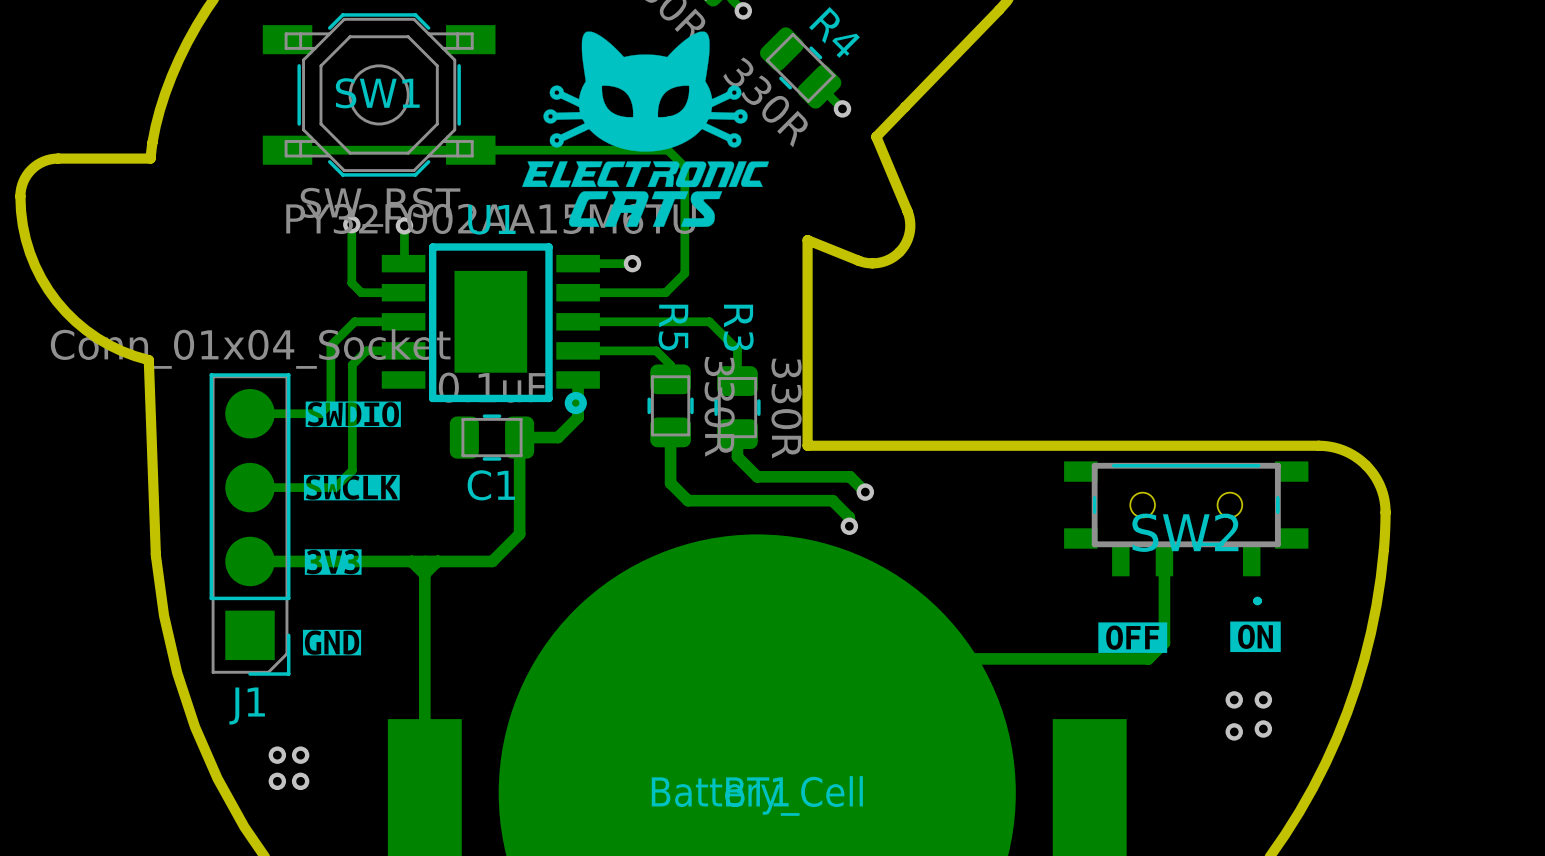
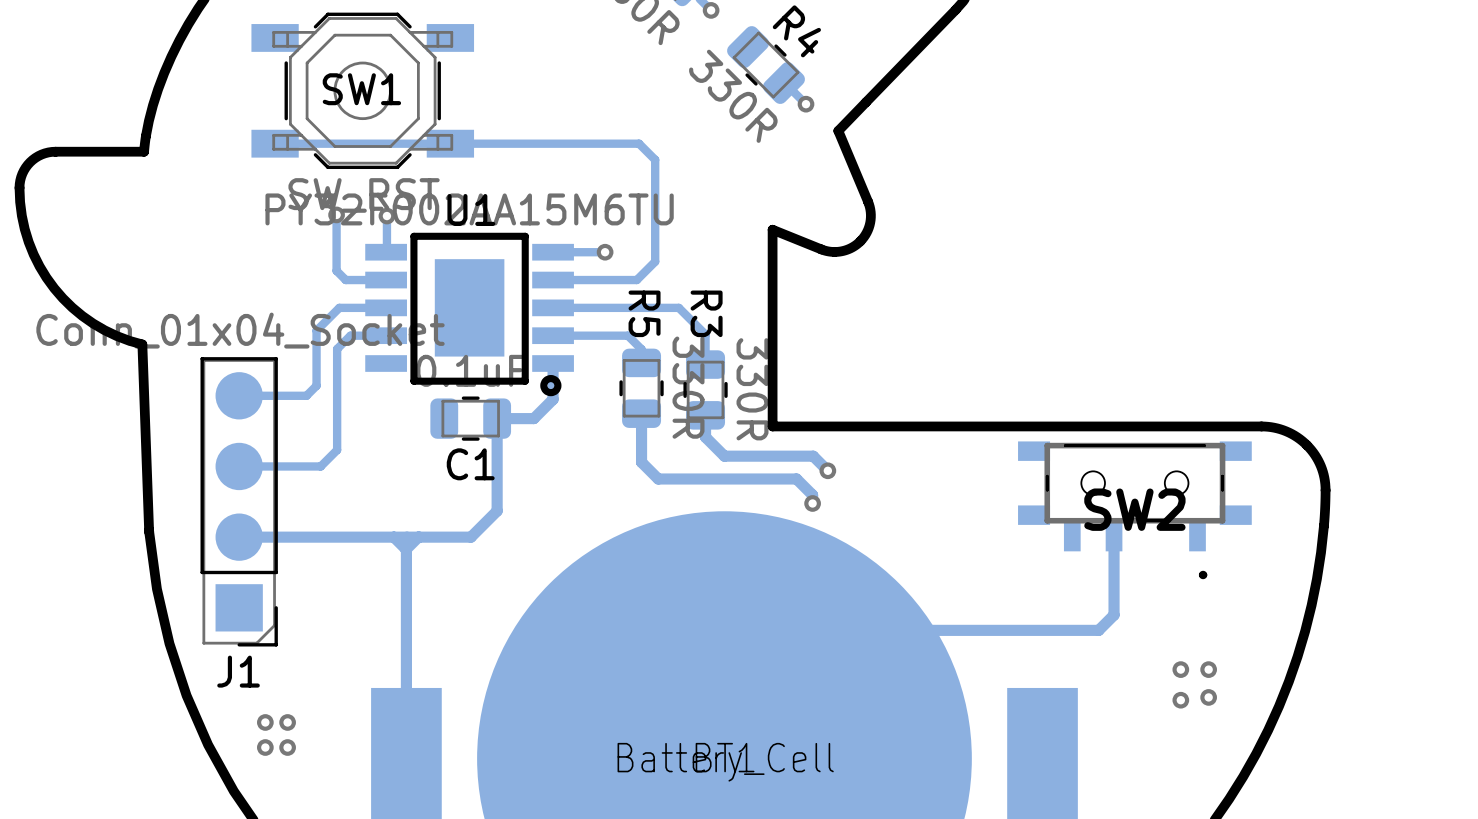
drawing: [522, 31, 769, 227] -> none
drawing: [305, 401, 401, 428] -> none
drawing: [303, 474, 400, 501] -> none
drawing: [304, 549, 362, 575] -> none
drawing: [1230, 621, 1281, 653] -> none
drawing: [1098, 622, 1168, 653] -> none
drawing: [302, 629, 362, 656] -> none

